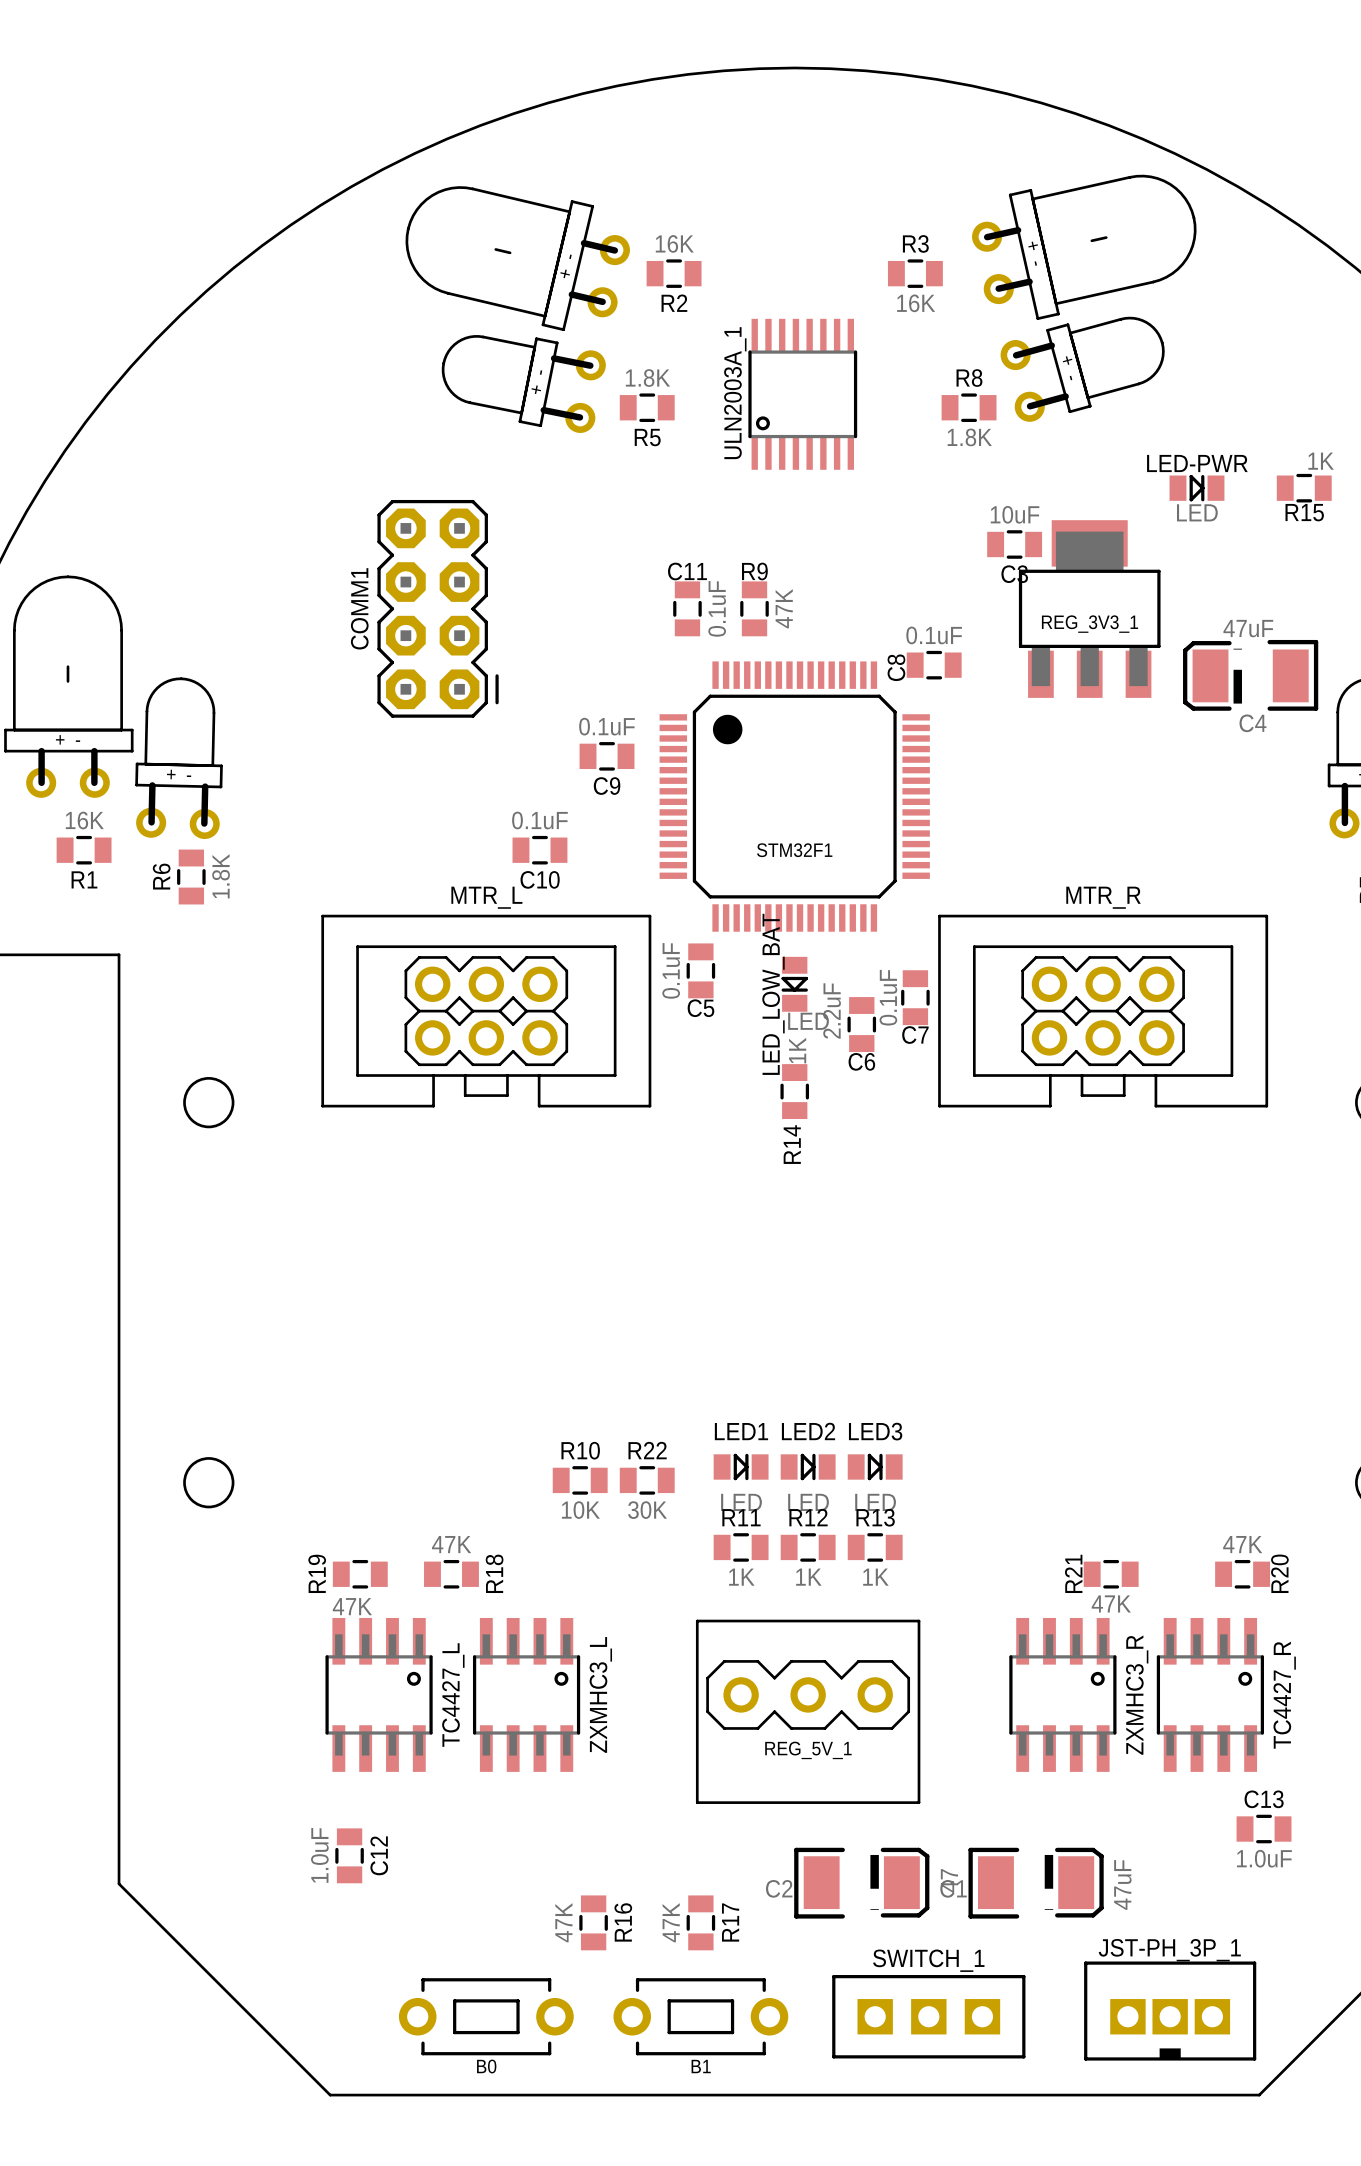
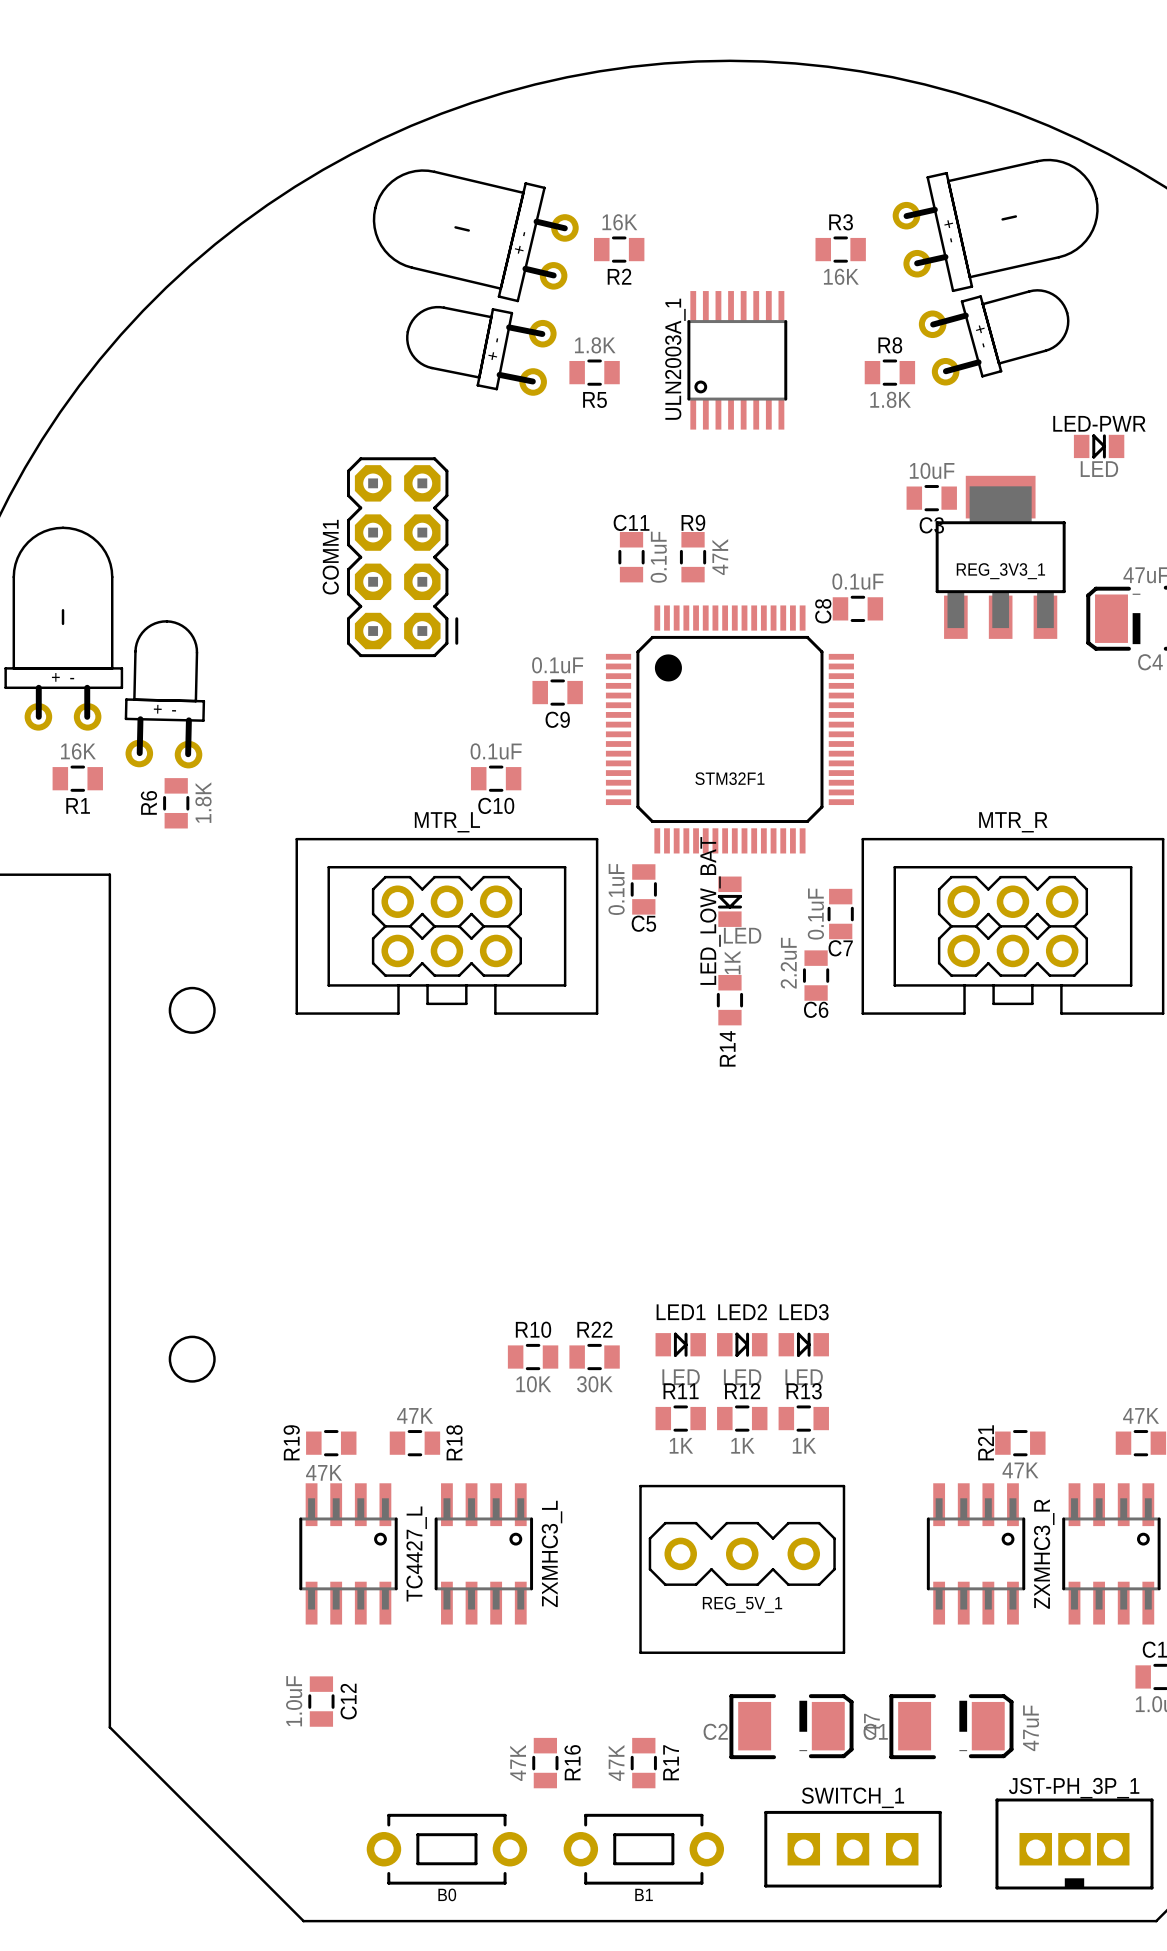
C6 position: (861, 1024) -> (816, 975)

